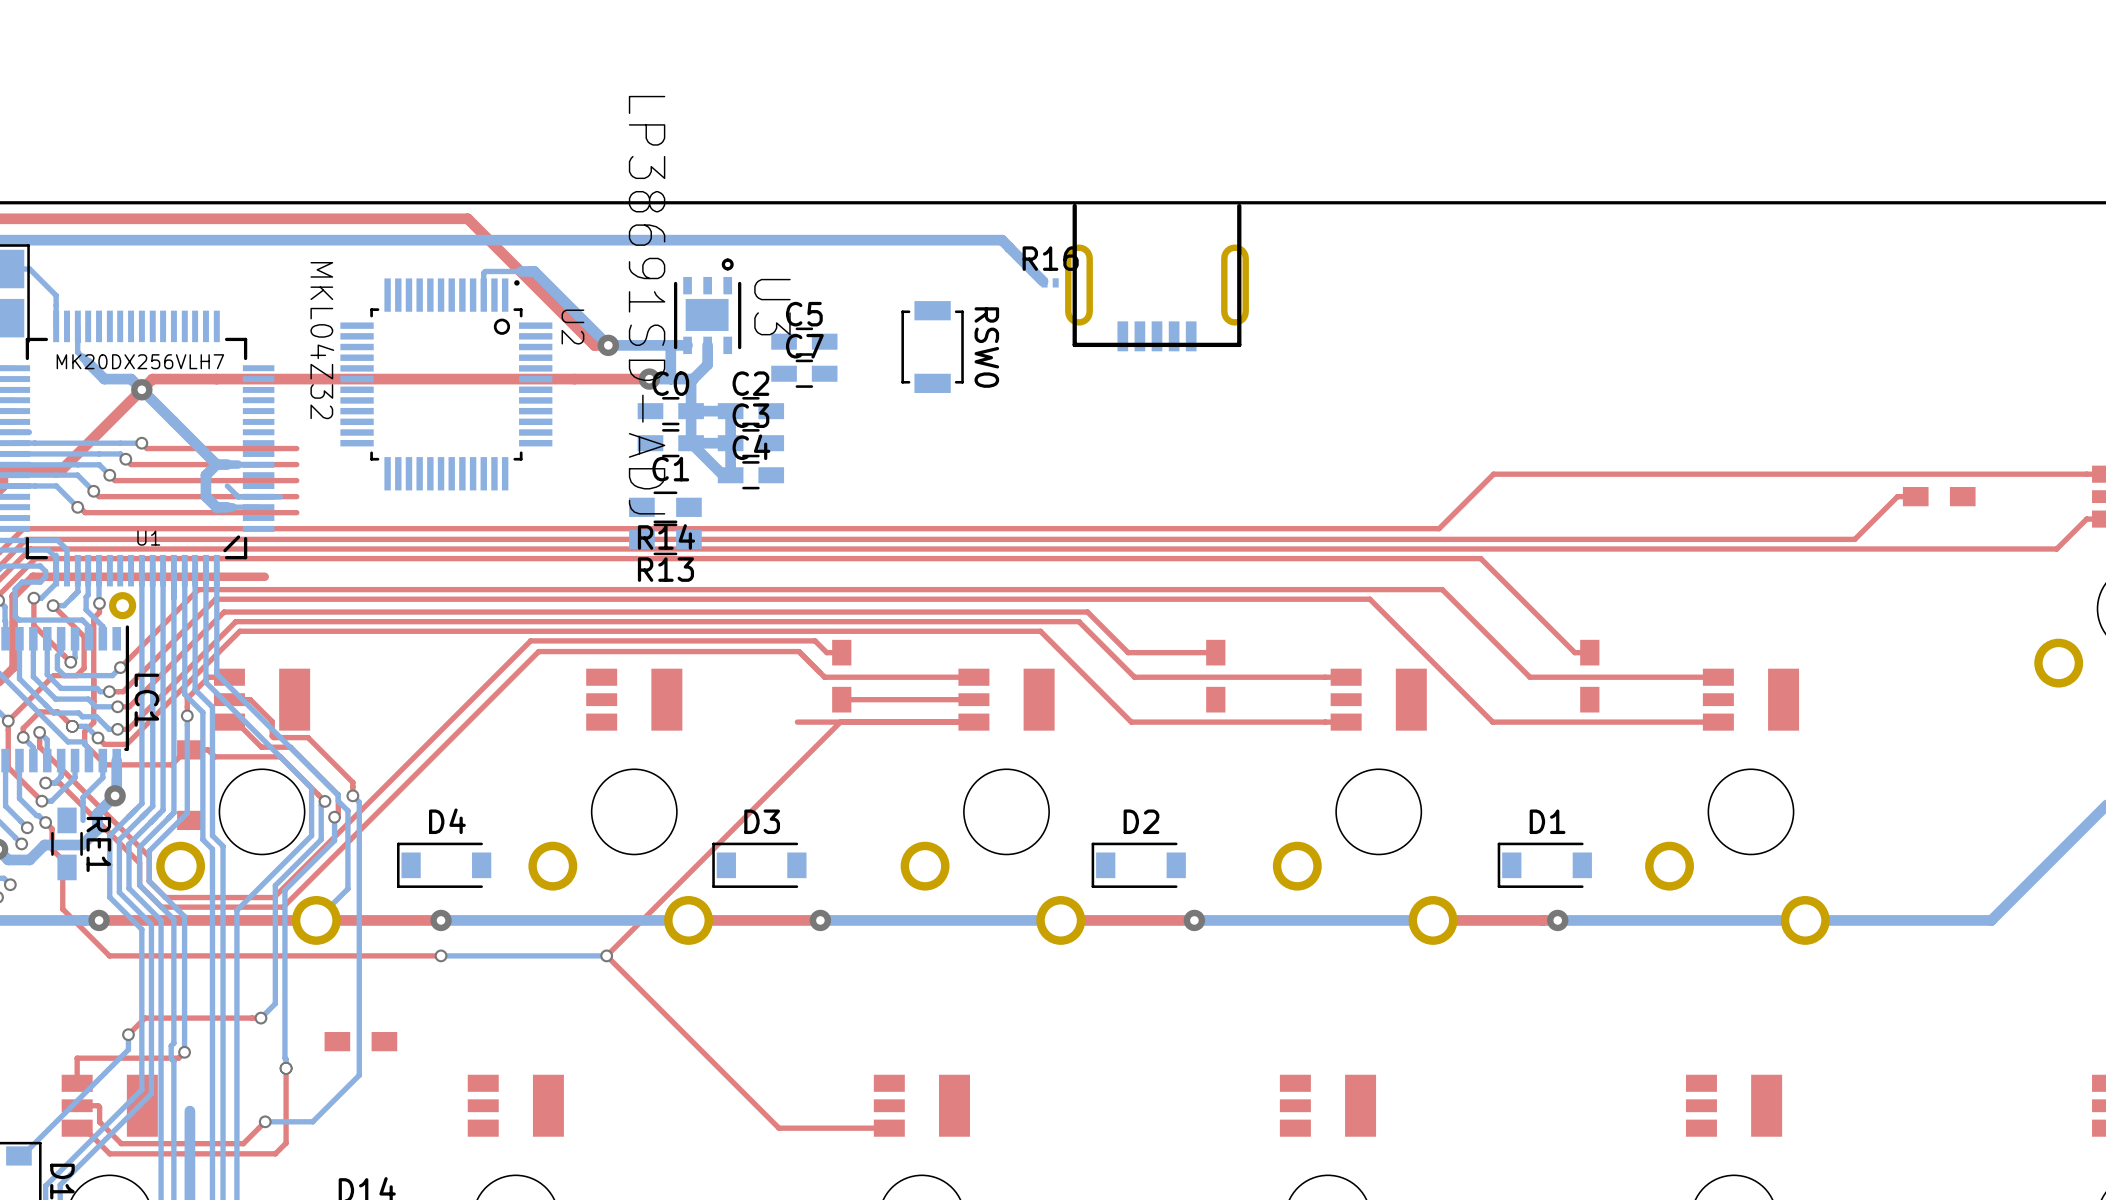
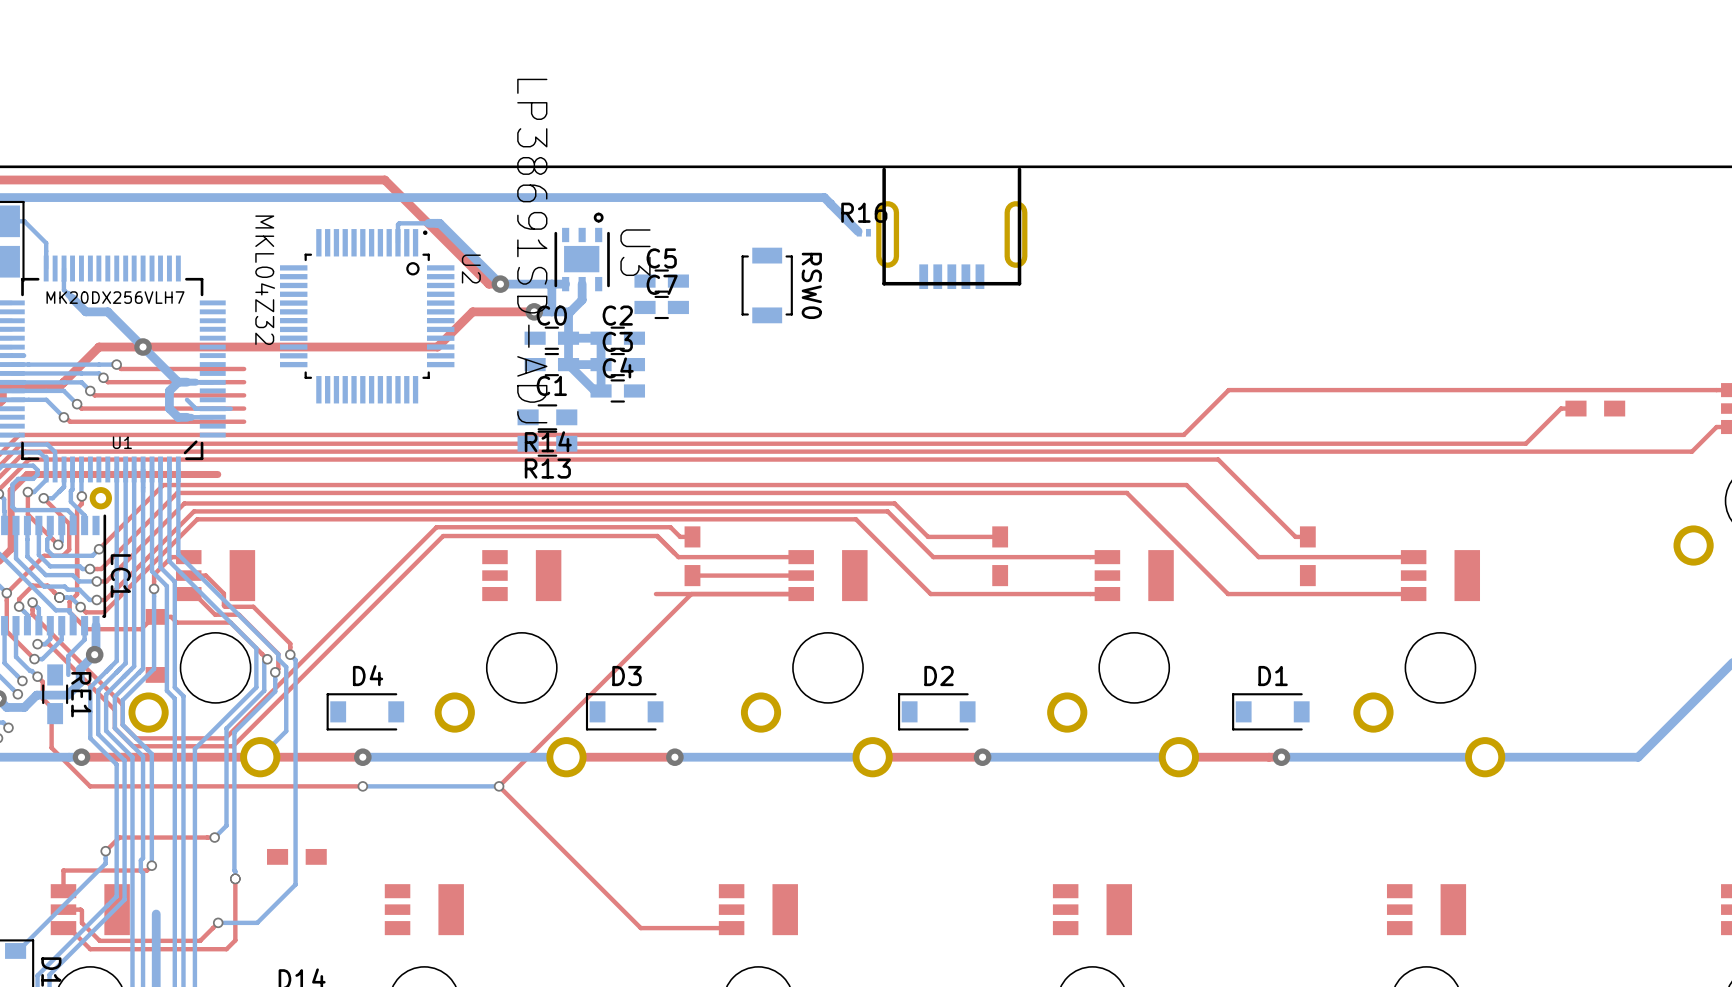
top track: (574, 379) (152, 379) (61, 469) -> (472, 311) (437, 347) (99, 347) (59, 386) (50, 386)
via position: (141, 389) -> (143, 347)

